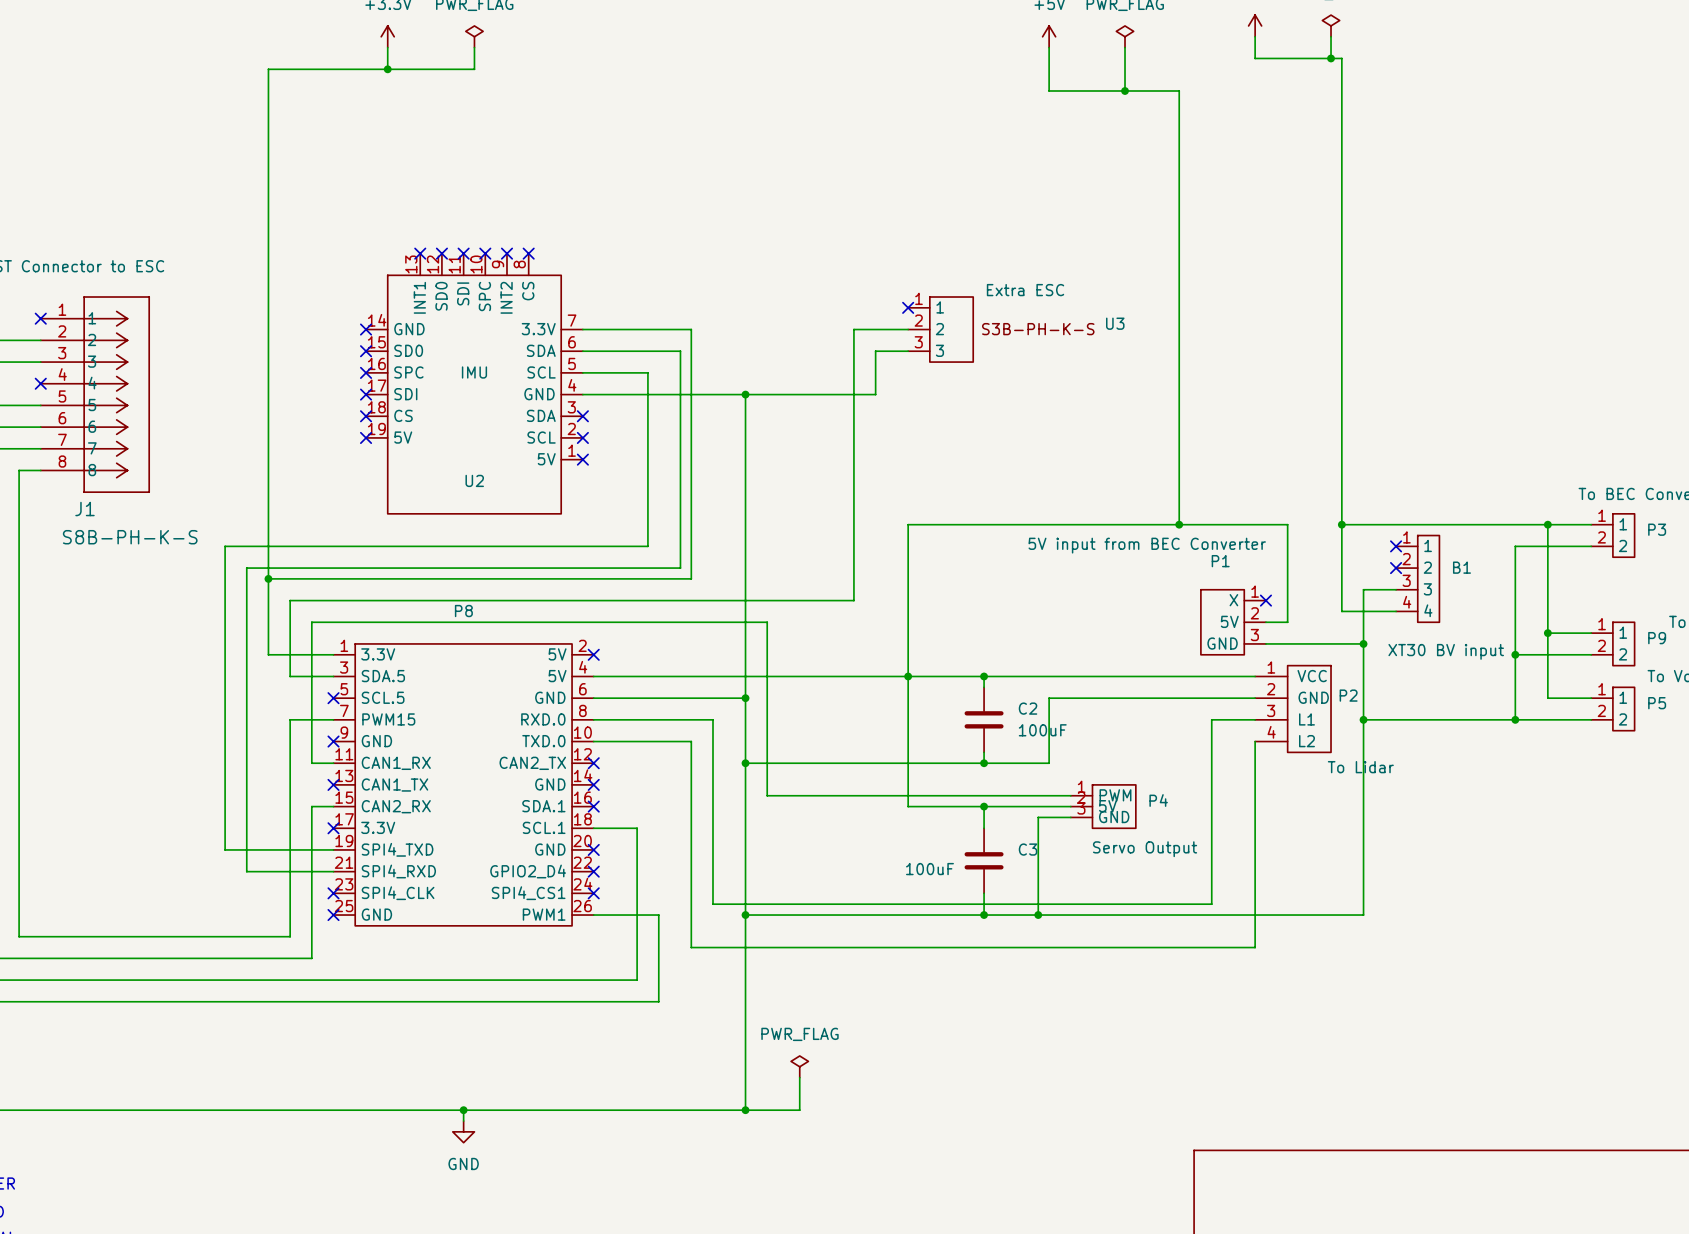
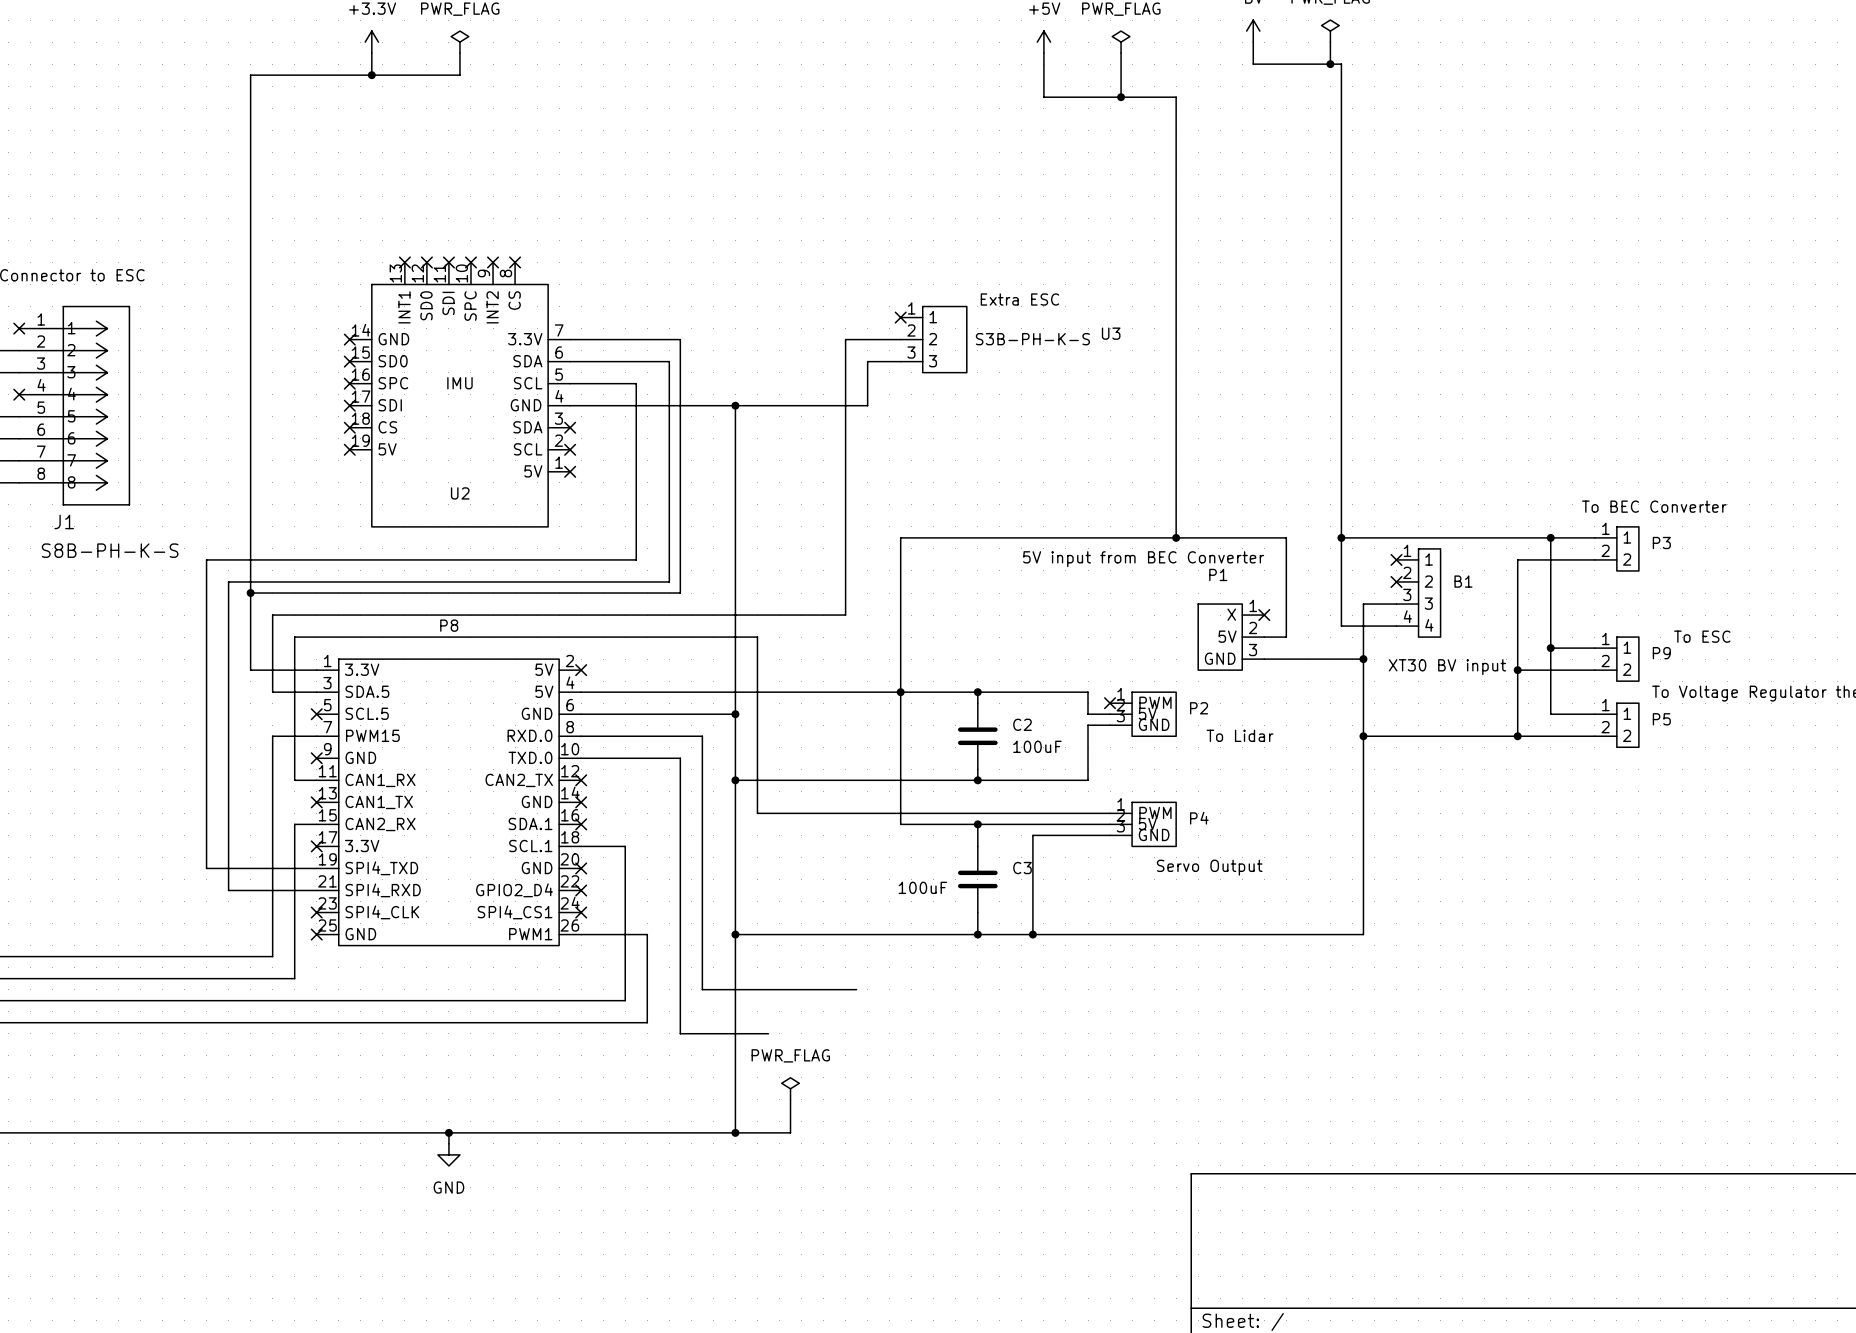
P2 symbol: [1255, 665, 1332, 753] -> [1110, 692, 1177, 737]
wire: (1092, 676) (1255, 676) -> (1088, 692) (1088, 714)
no-connect mark: none -> (1110, 703)
wire: (1092, 698) (1049, 698) (1049, 763) -> (1110, 725) (1088, 725) (1088, 780) (1043, 780)
wire: (1114, 698) (1255, 698) -> none
wire: (1255, 719) (1211, 719) (1211, 904) (712, 904) -> (856, 989) (702, 989) (702, 923)
wire: (1255, 741) (1255, 947) (691, 947) -> (768, 1033) (680, 1033) (680, 967)
P2 text position: To Lidar (1360, 767) -> To Lidar (1240, 735)
P4 position: (1103, 806) -> (1143, 824)
P4 text position: Servo Output (1145, 849) -> Servo Output (1209, 867)

